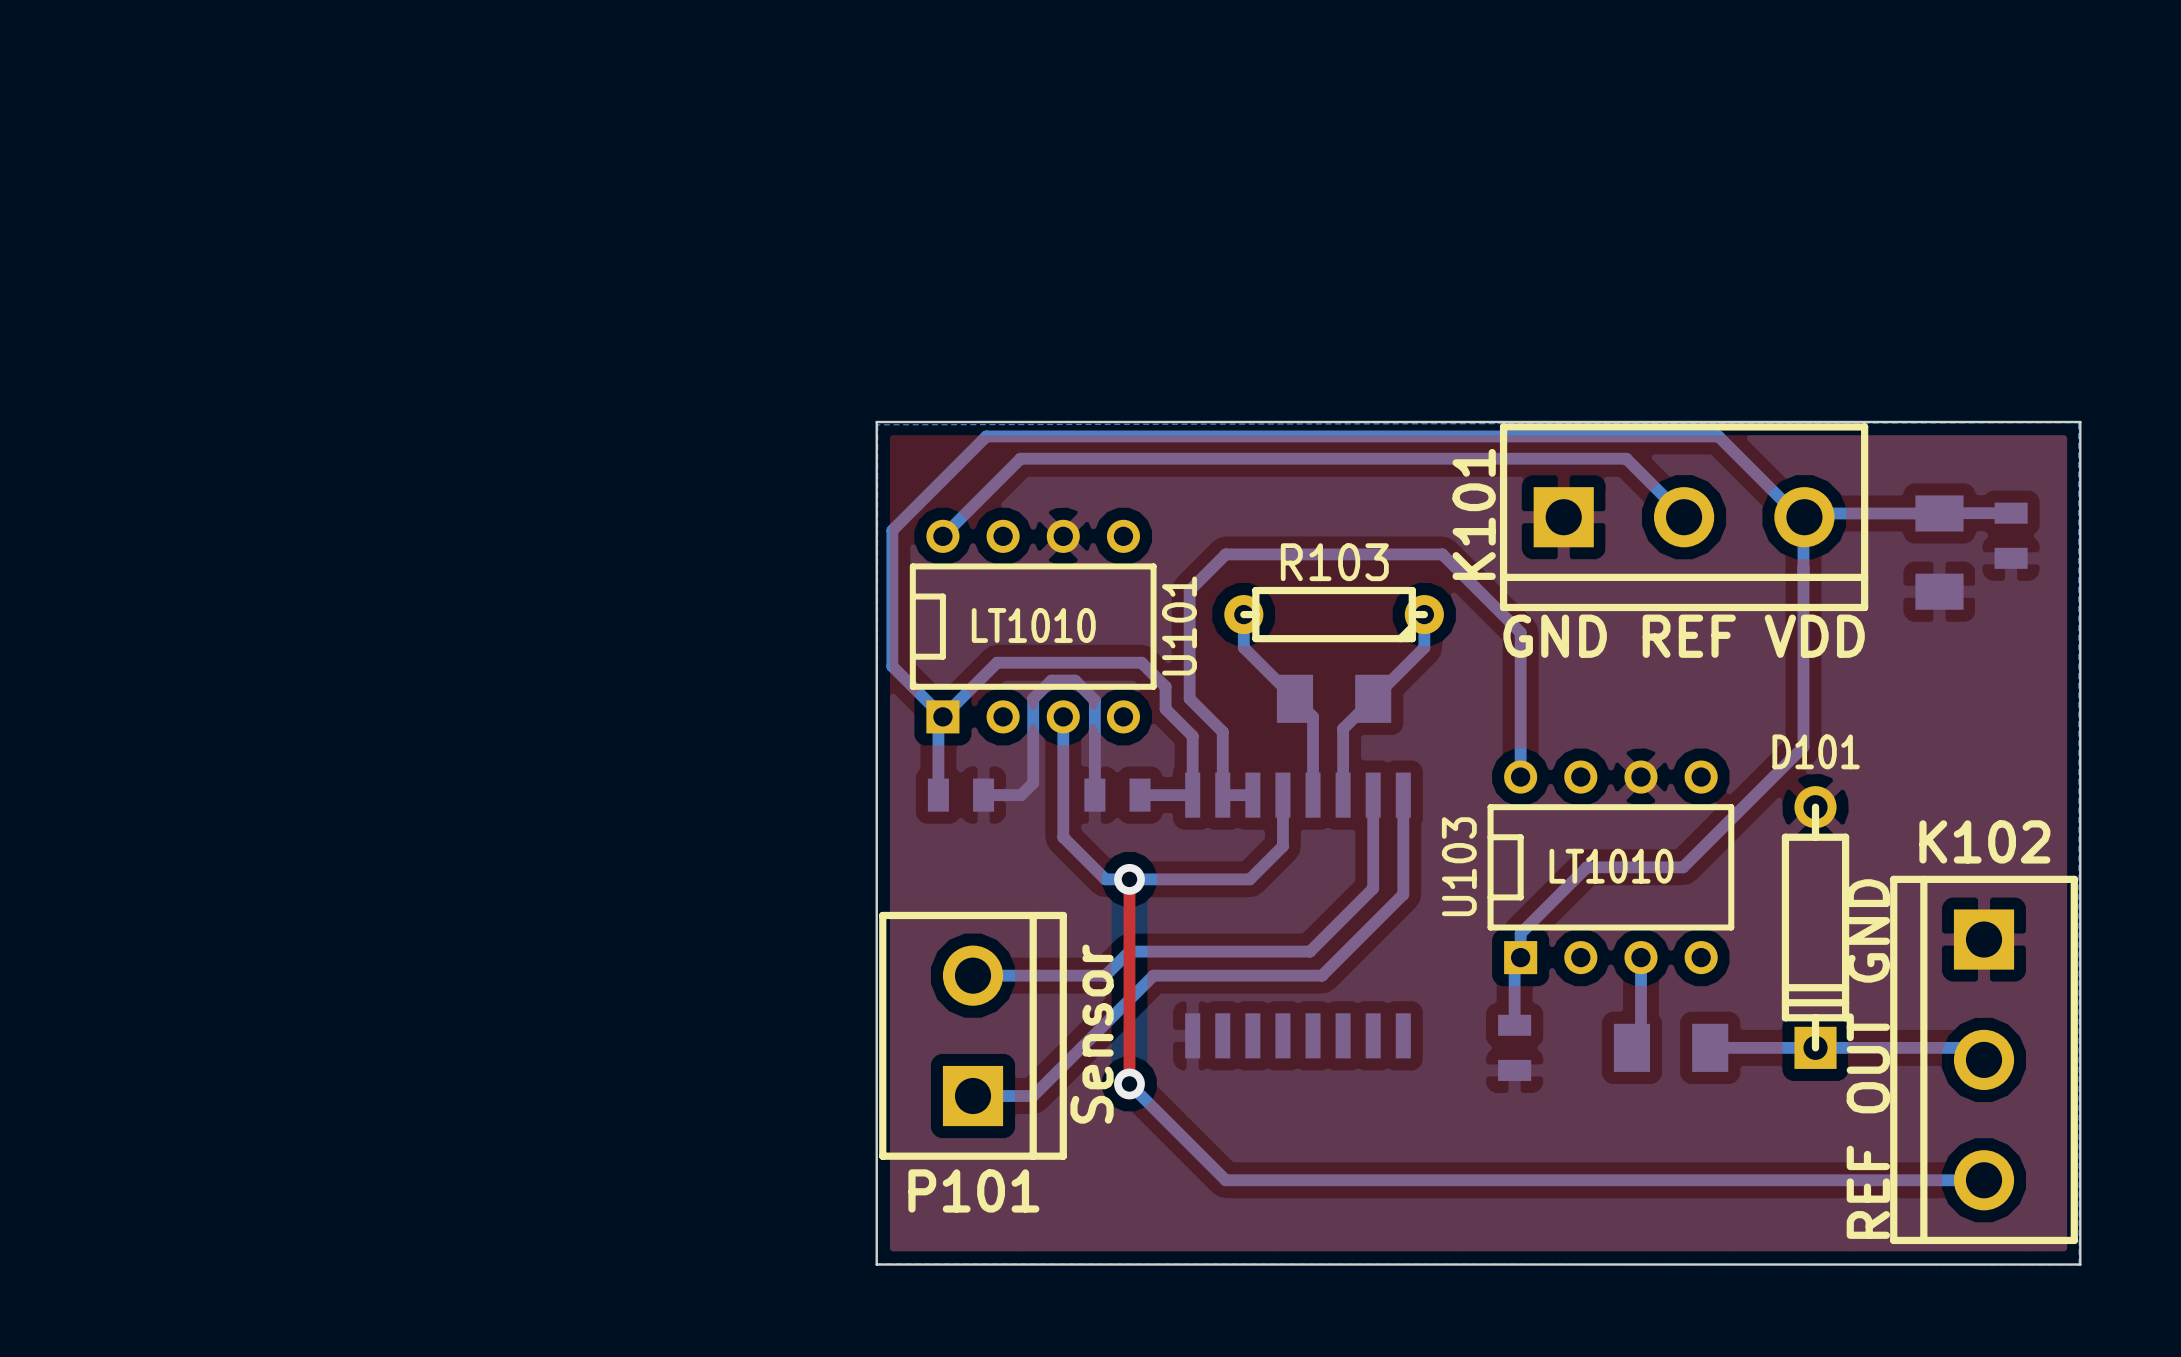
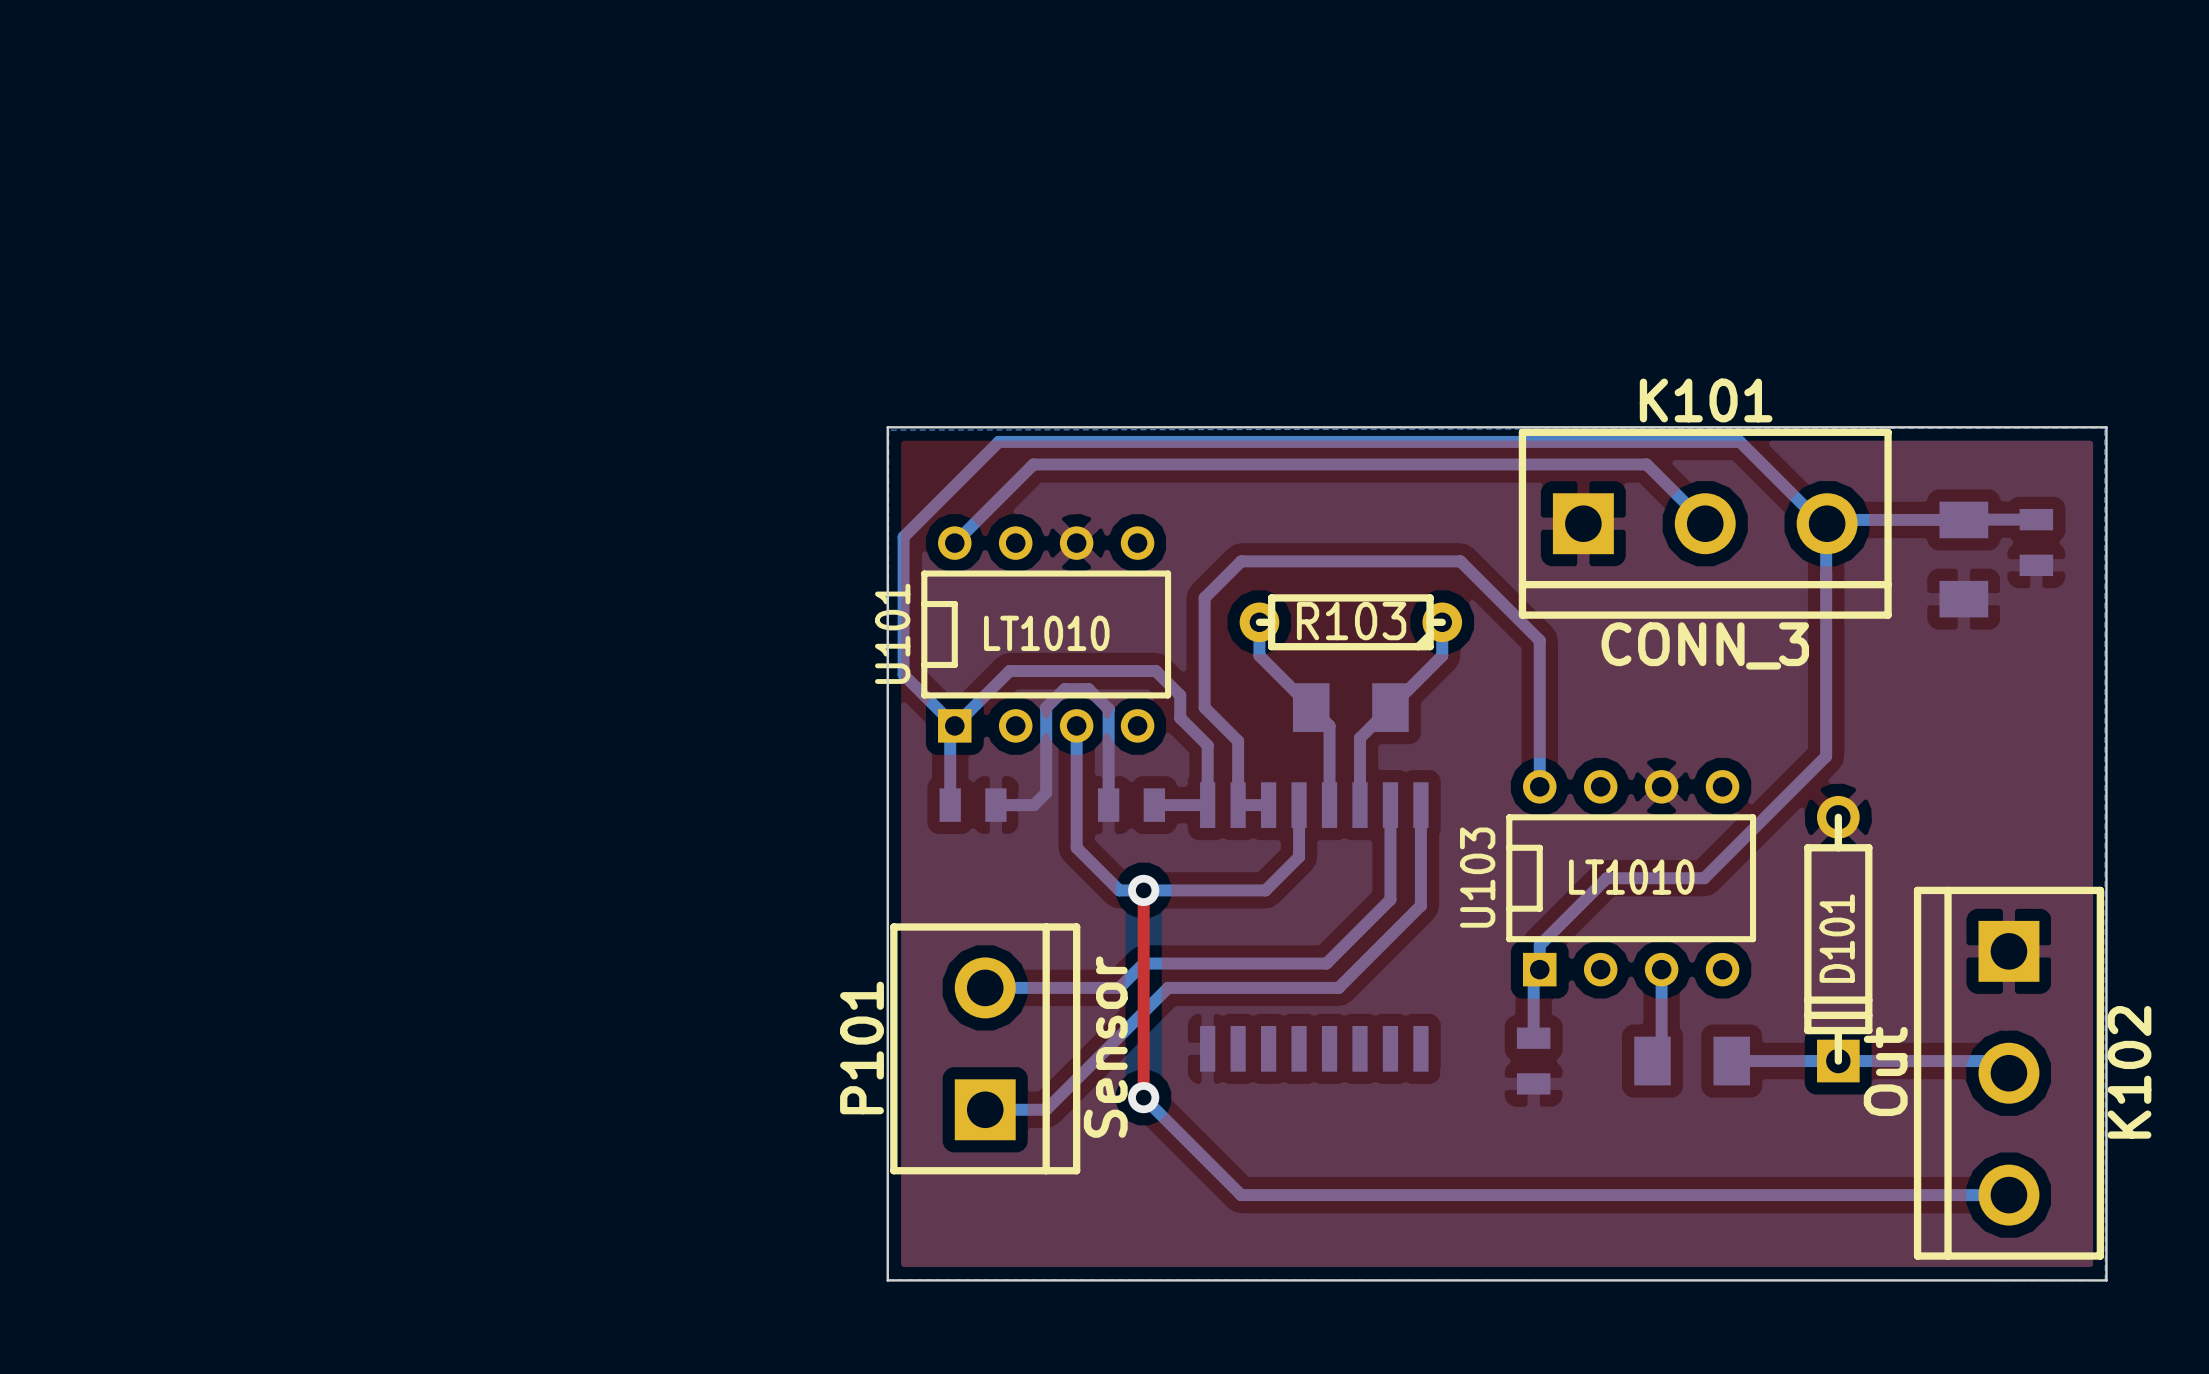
K101 name rotation: 0° (1474, 514) -> 90° clockwise (1706, 400)
K101 name position: K101 (1474, 514) -> K101 (1706, 400)
R103 name position: R103 (1334, 562) -> R103 (1351, 621)
U101 name position: U101 (1179, 625) -> U101 (892, 633)
K101 value: GND REF VDD (1684, 636) -> CONN_3 (1705, 645)
D101 name rotation: 0° (1816, 751) -> 90° counterclockwise (1837, 938)
D101 name position: D101 (1816, 751) -> D101 (1837, 938)
K102 name rotation: 0° (1984, 841) -> 90° counterclockwise (2129, 1072)
K102 name position: K102 (1984, 841) -> K102 (2129, 1072)
K102 value: REF OUT GND (1868, 1059) -> Out (1885, 1071)
P101 name rotation: 0° (973, 1190) -> 90° counterclockwise (862, 1047)
P101 name position: P101 (973, 1190) -> P101 (862, 1047)

